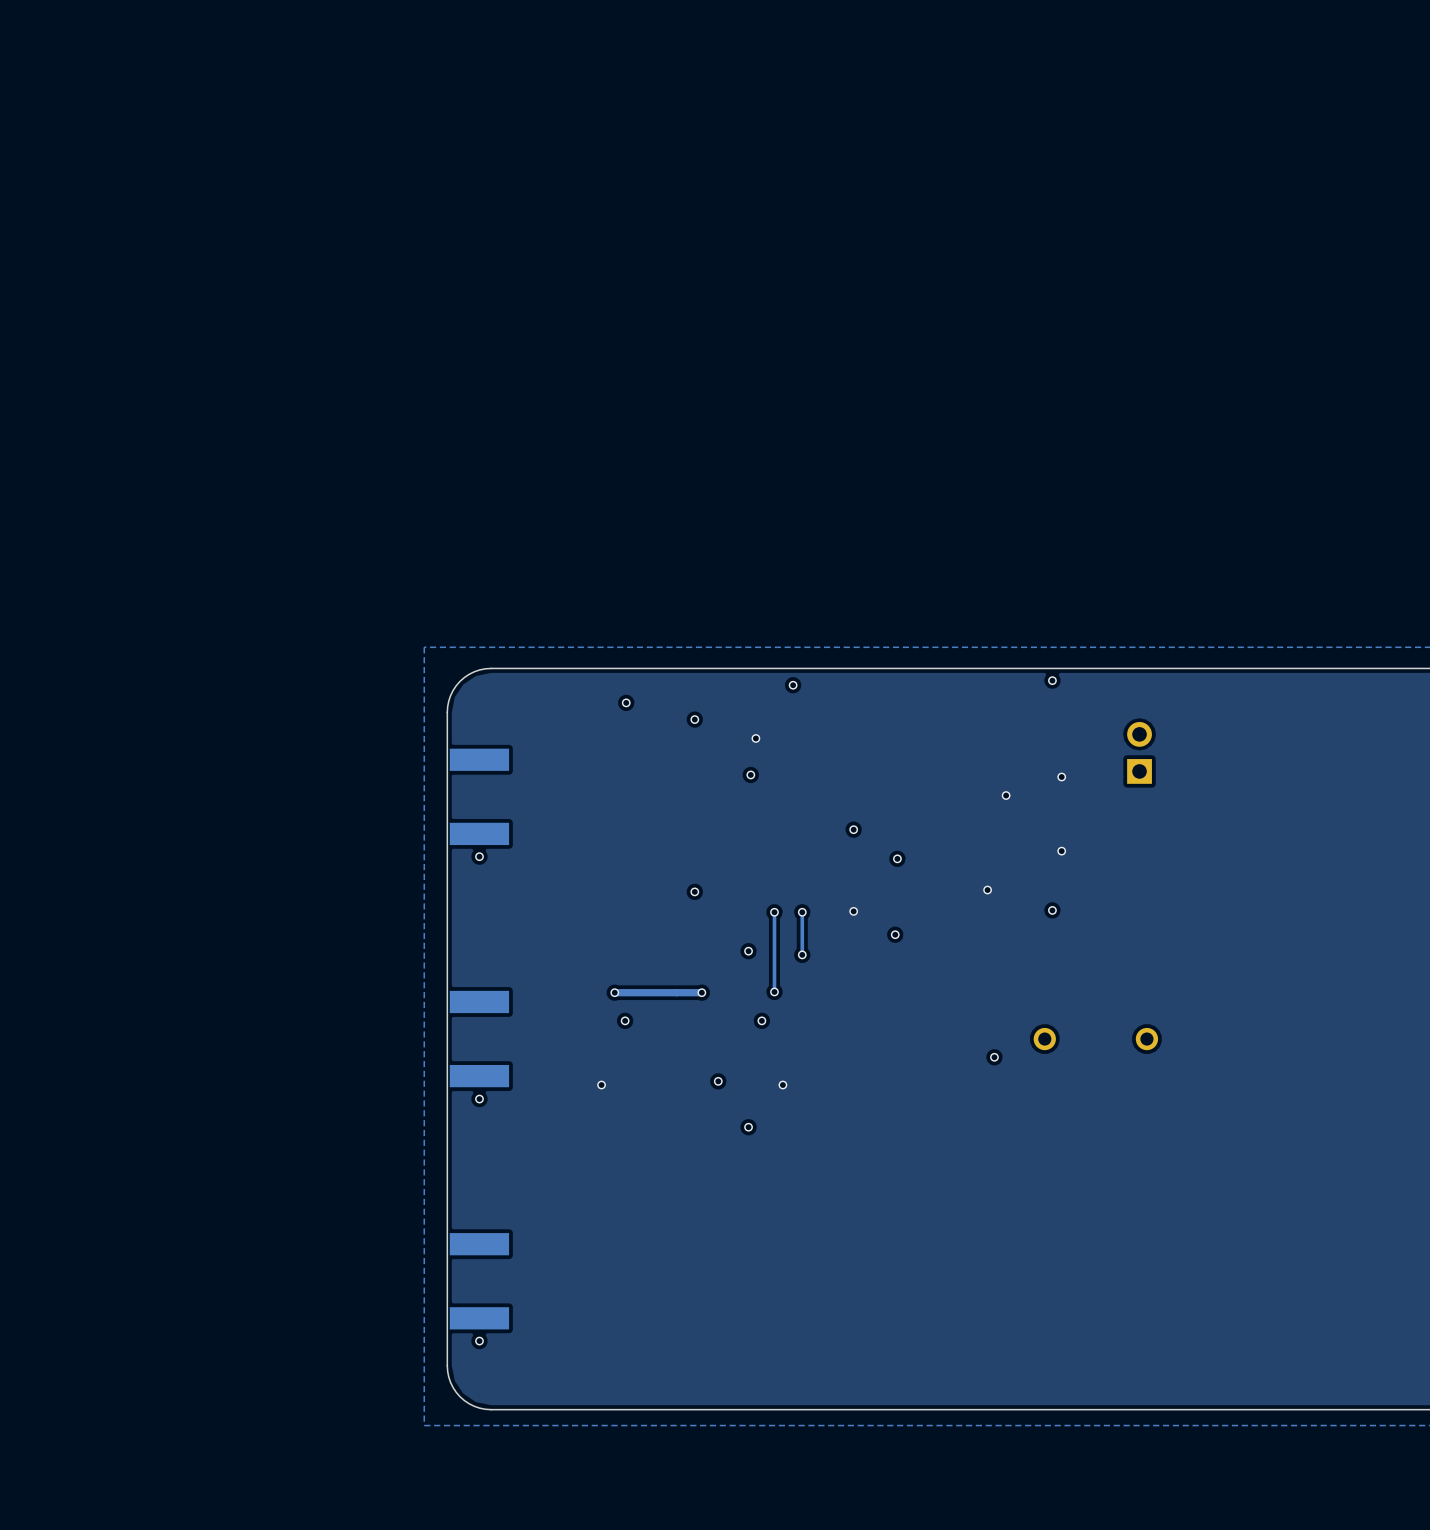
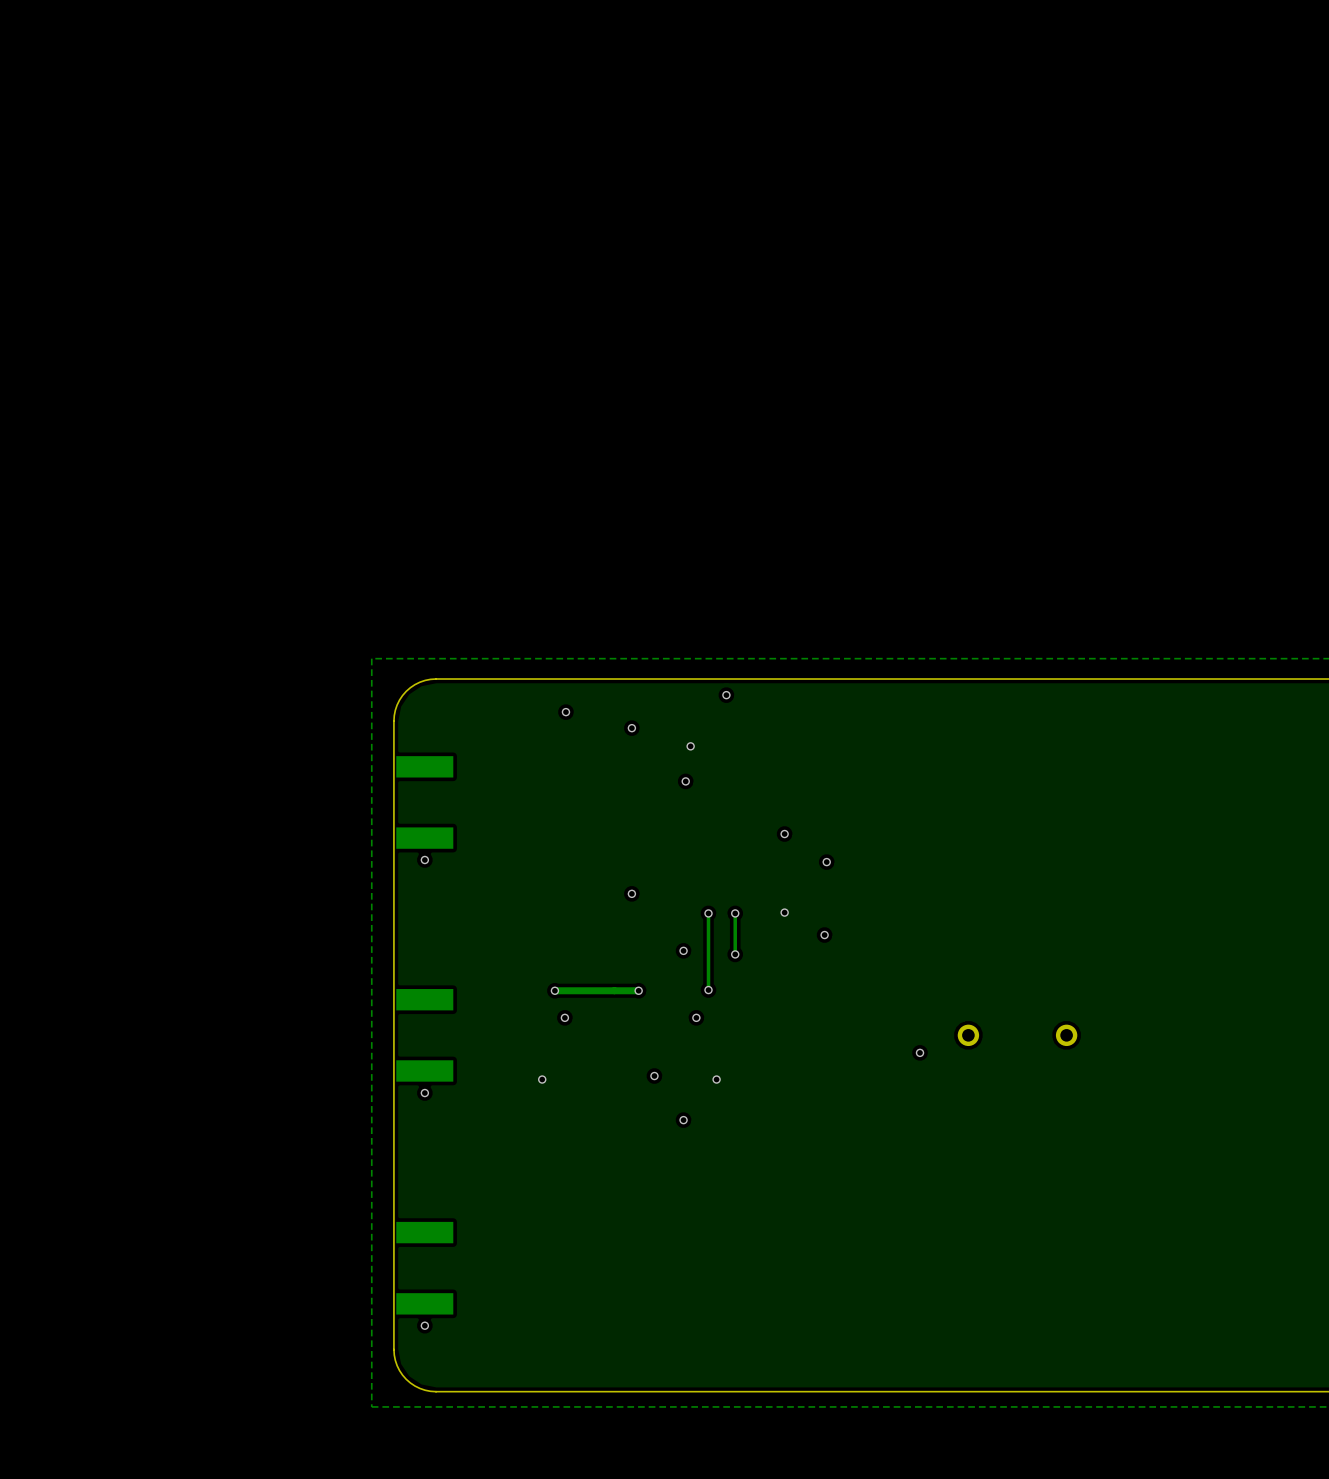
via: (1052, 680) -> none
part: (1139, 752) -> none
via: (1061, 777) -> none
via: (1006, 795) -> none
via: (1061, 851) -> none
via: (987, 890) -> none
via: (1052, 910) -> none

